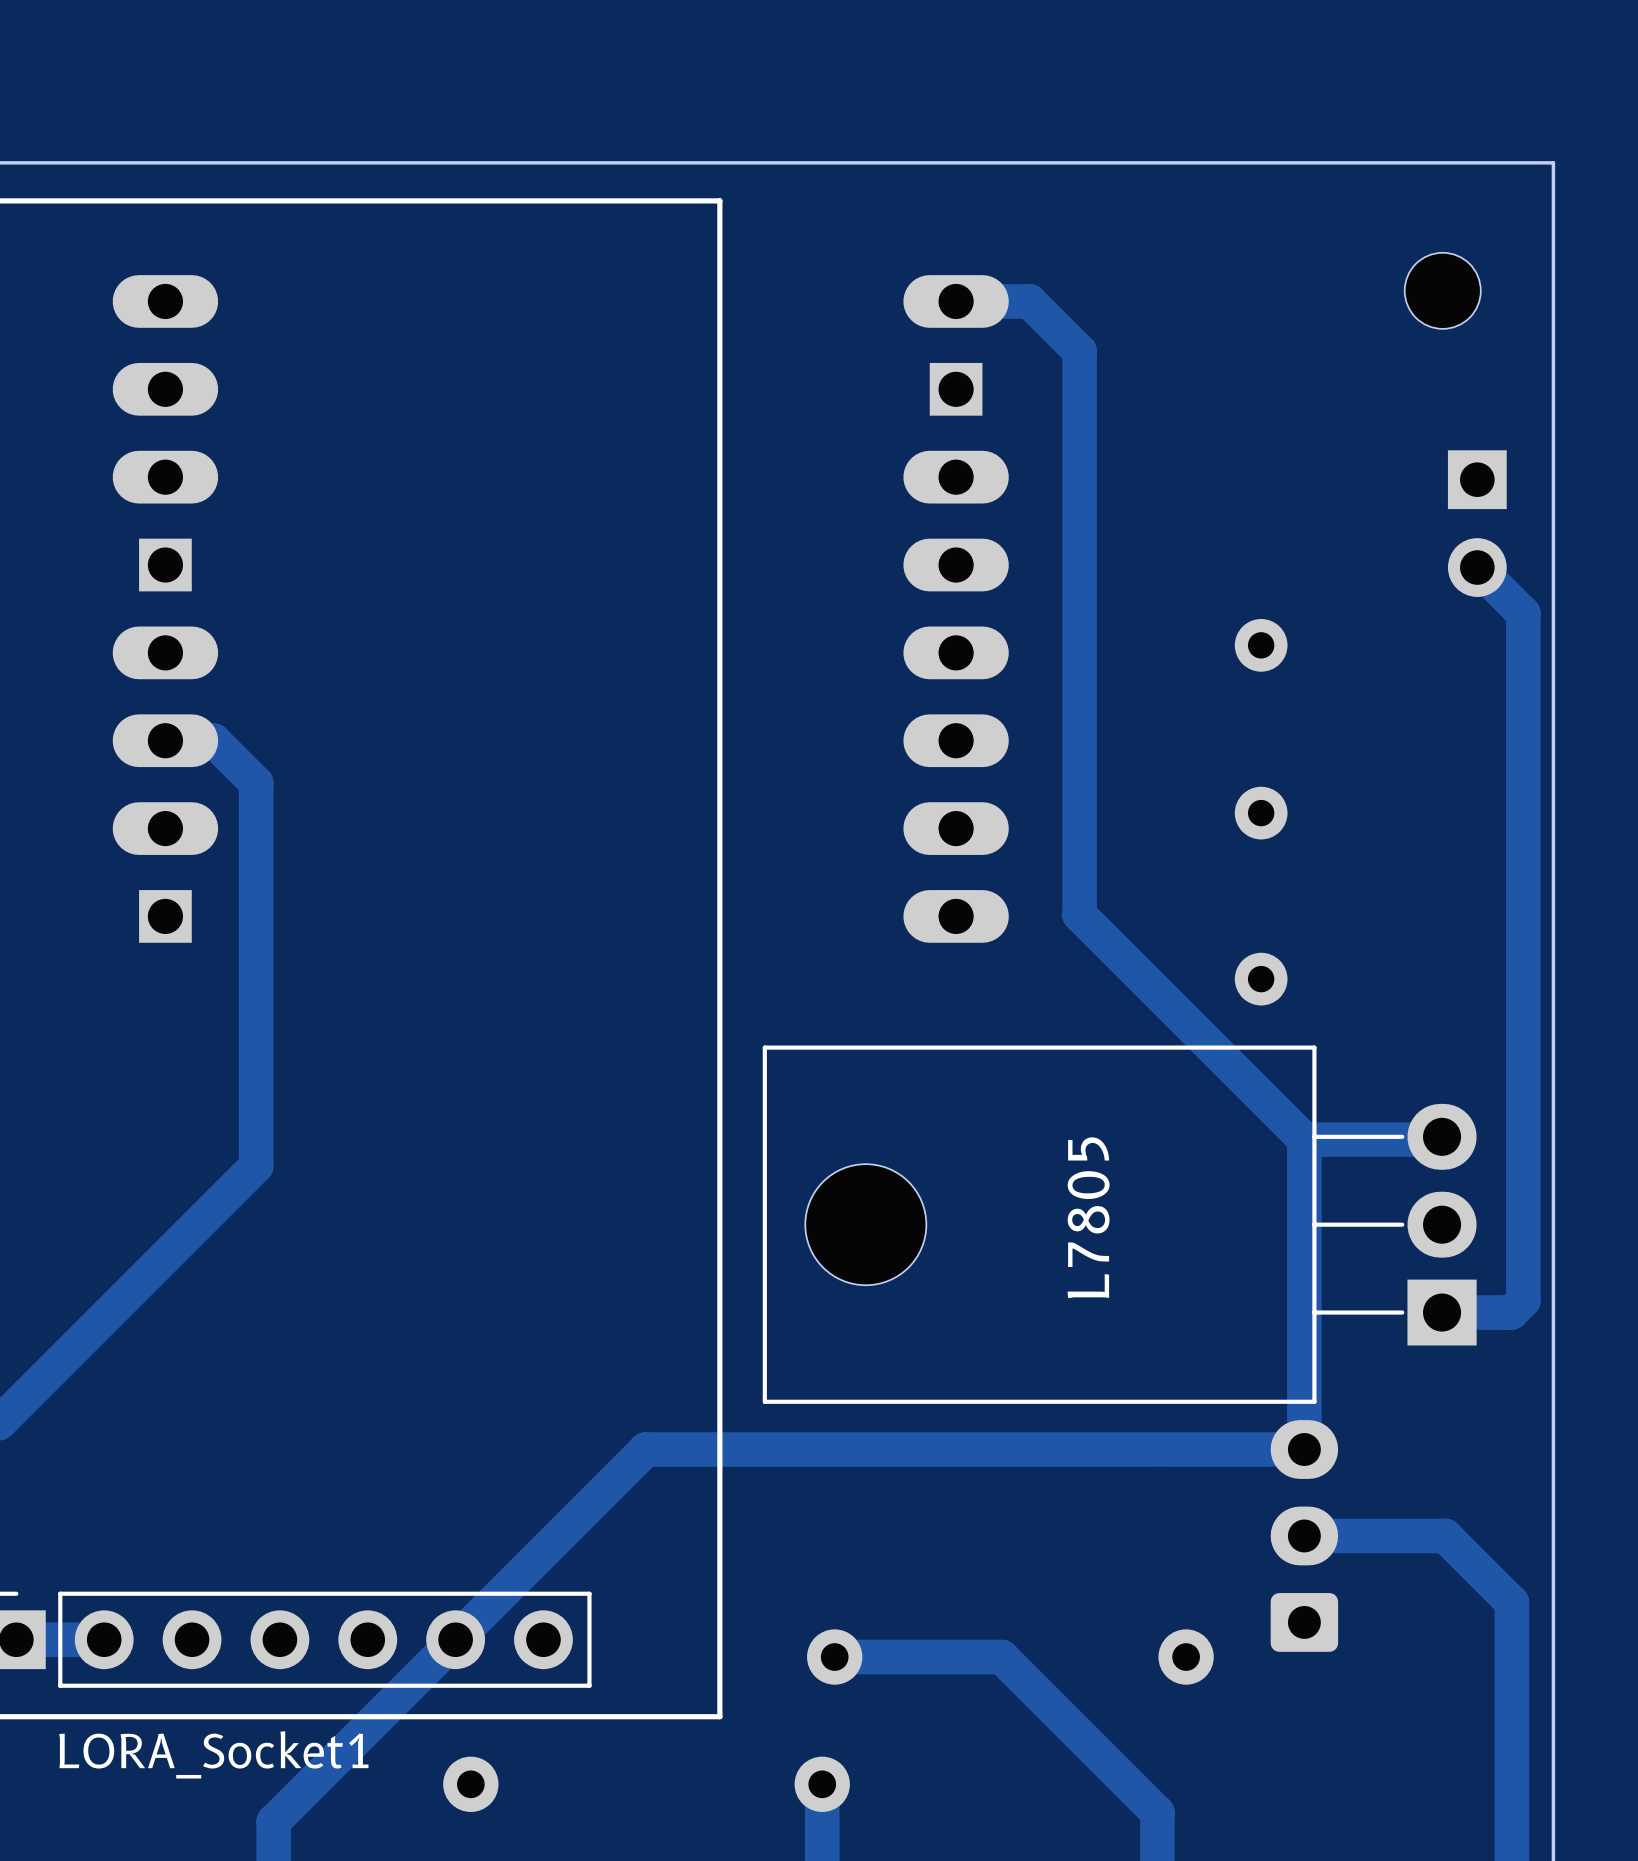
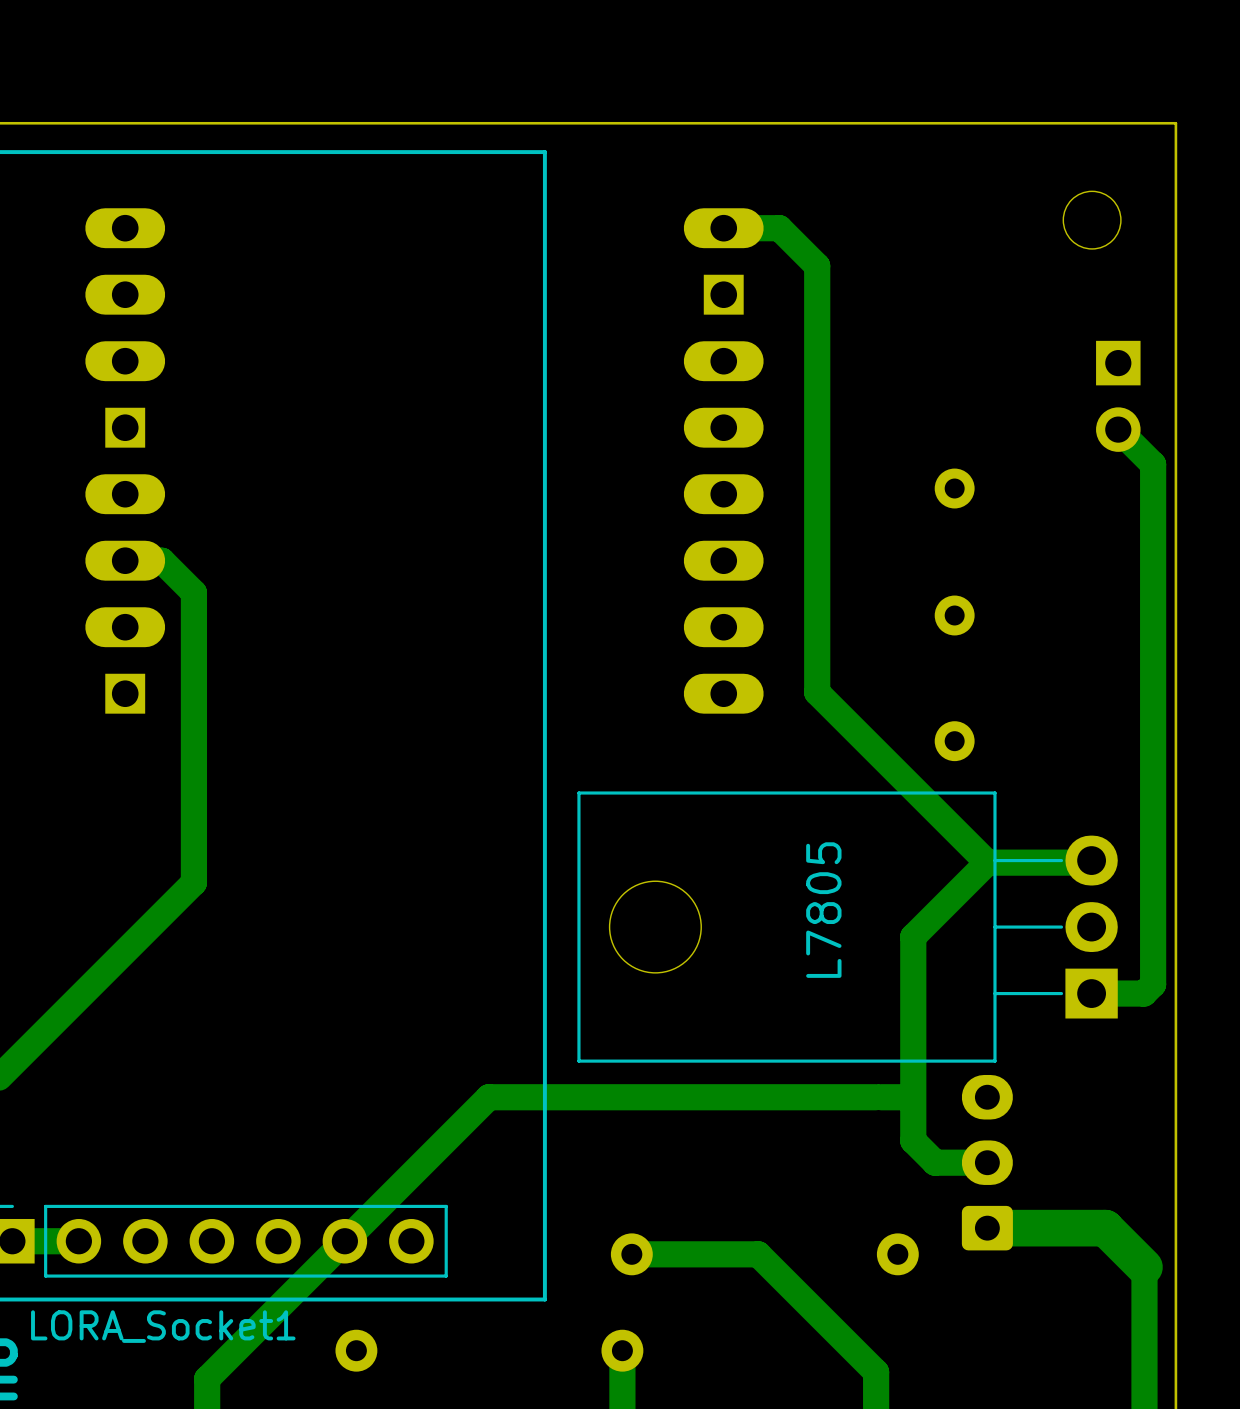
track: (1304, 1139) (1304, 1449) (1201, 1449) -> (987, 862) (913, 936) (913, 1140) (935, 1162) (987, 1162)
track: (1304, 1535) (1445, 1535) (1511, 1602) (1511, 1674) -> (987, 1228) (1105, 1228) (1144, 1267)

